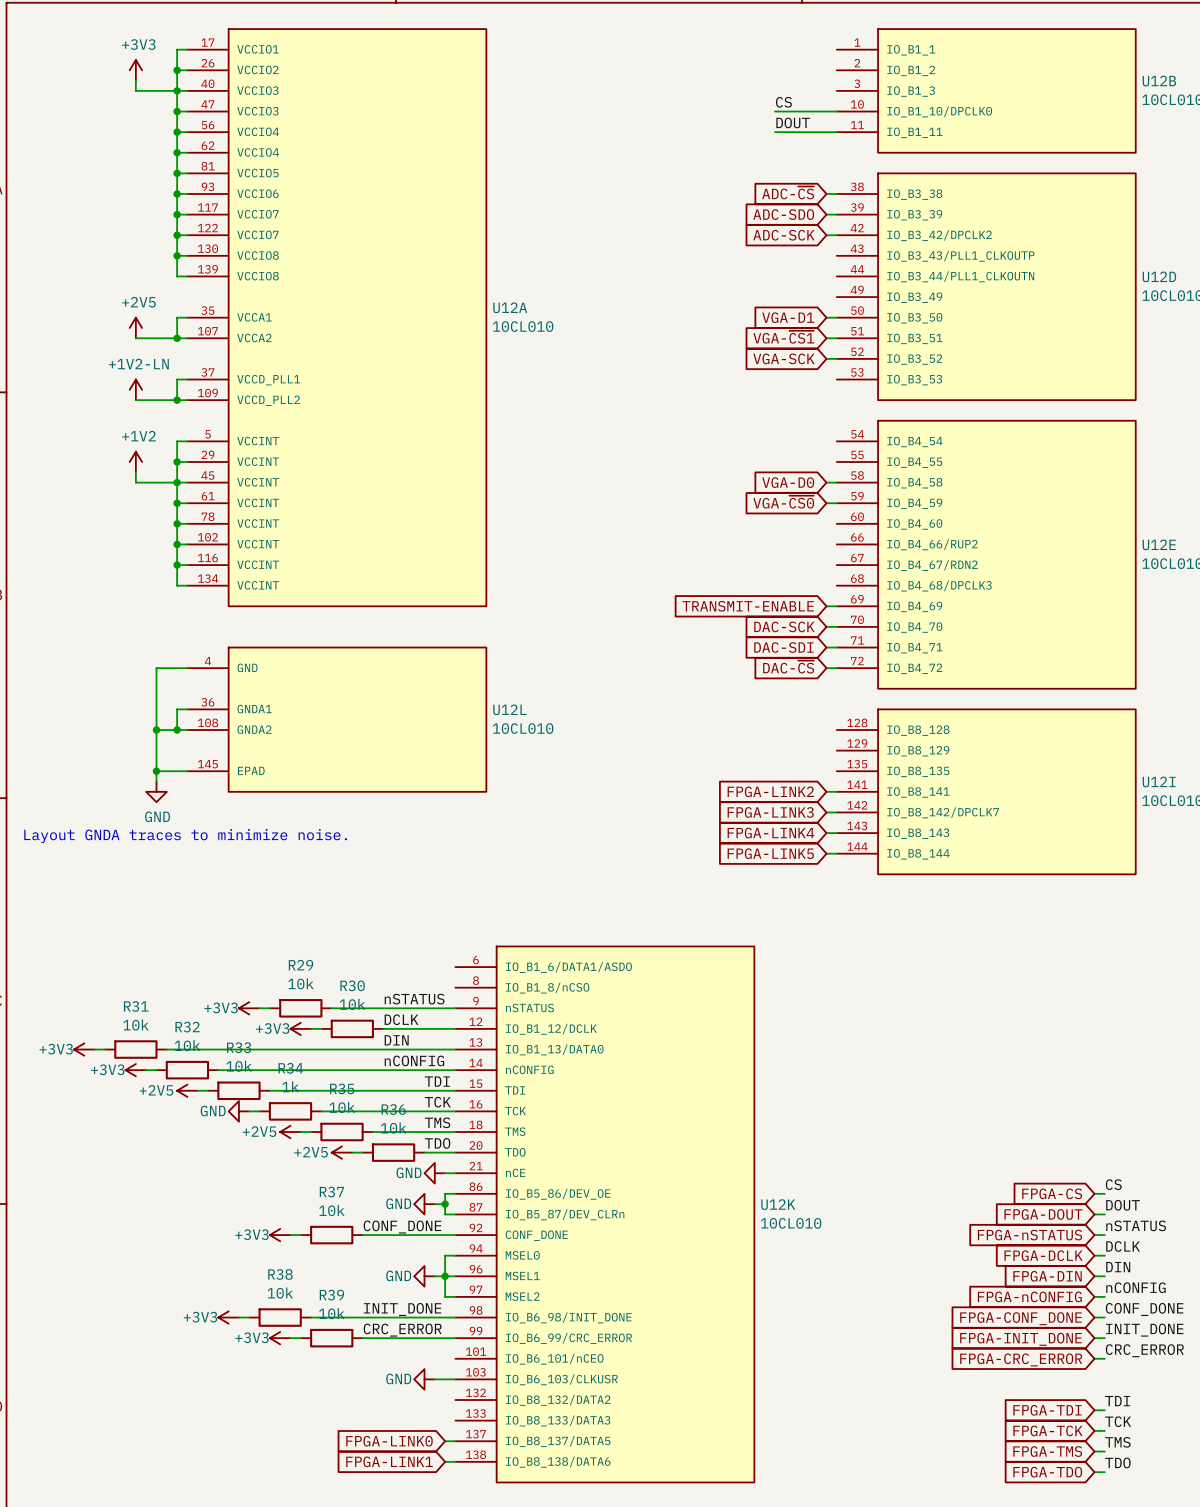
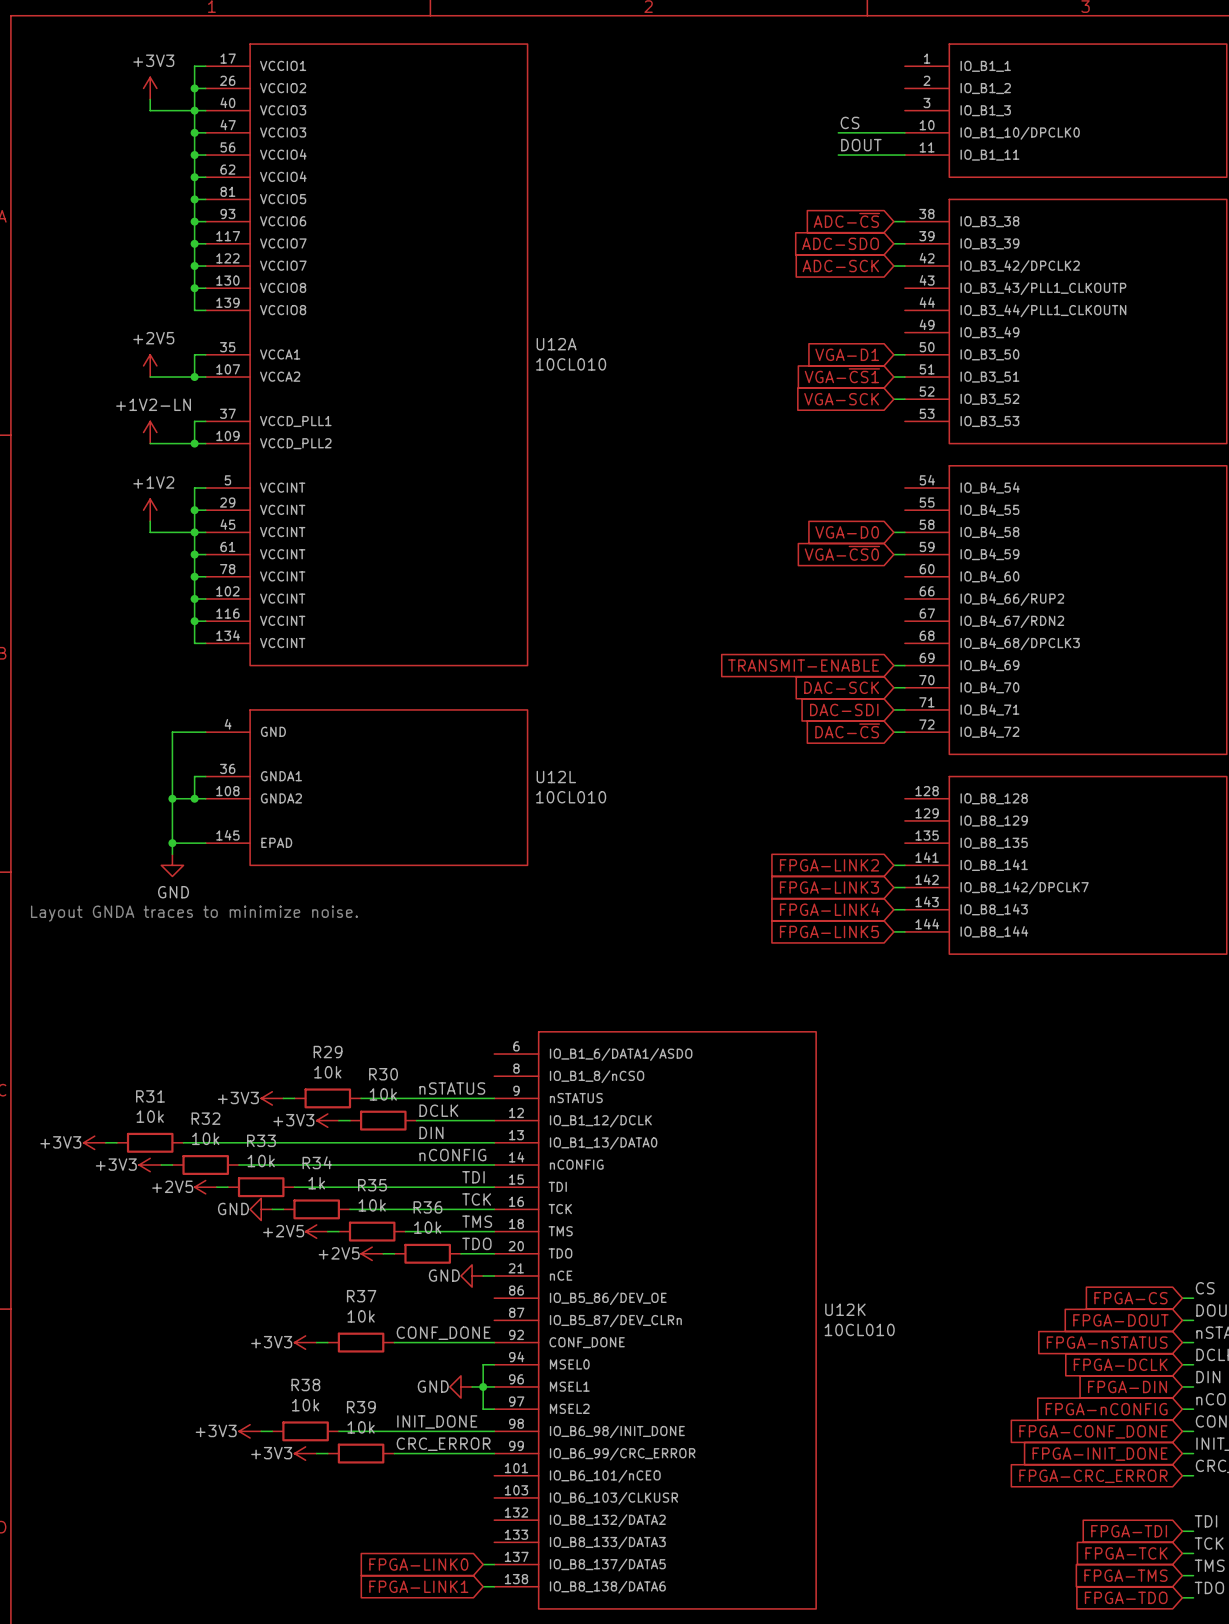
wire: (455, 1193) (445, 1193) (445, 1214) (455, 1214) -> none
power symbol: GND (424, 1204) -> none
wire: (434, 1204) (445, 1204) -> none
junction: (445, 1204) -> none
power symbol: GND (424, 1379) -> none
wire: (434, 1379) (455, 1379) -> none

